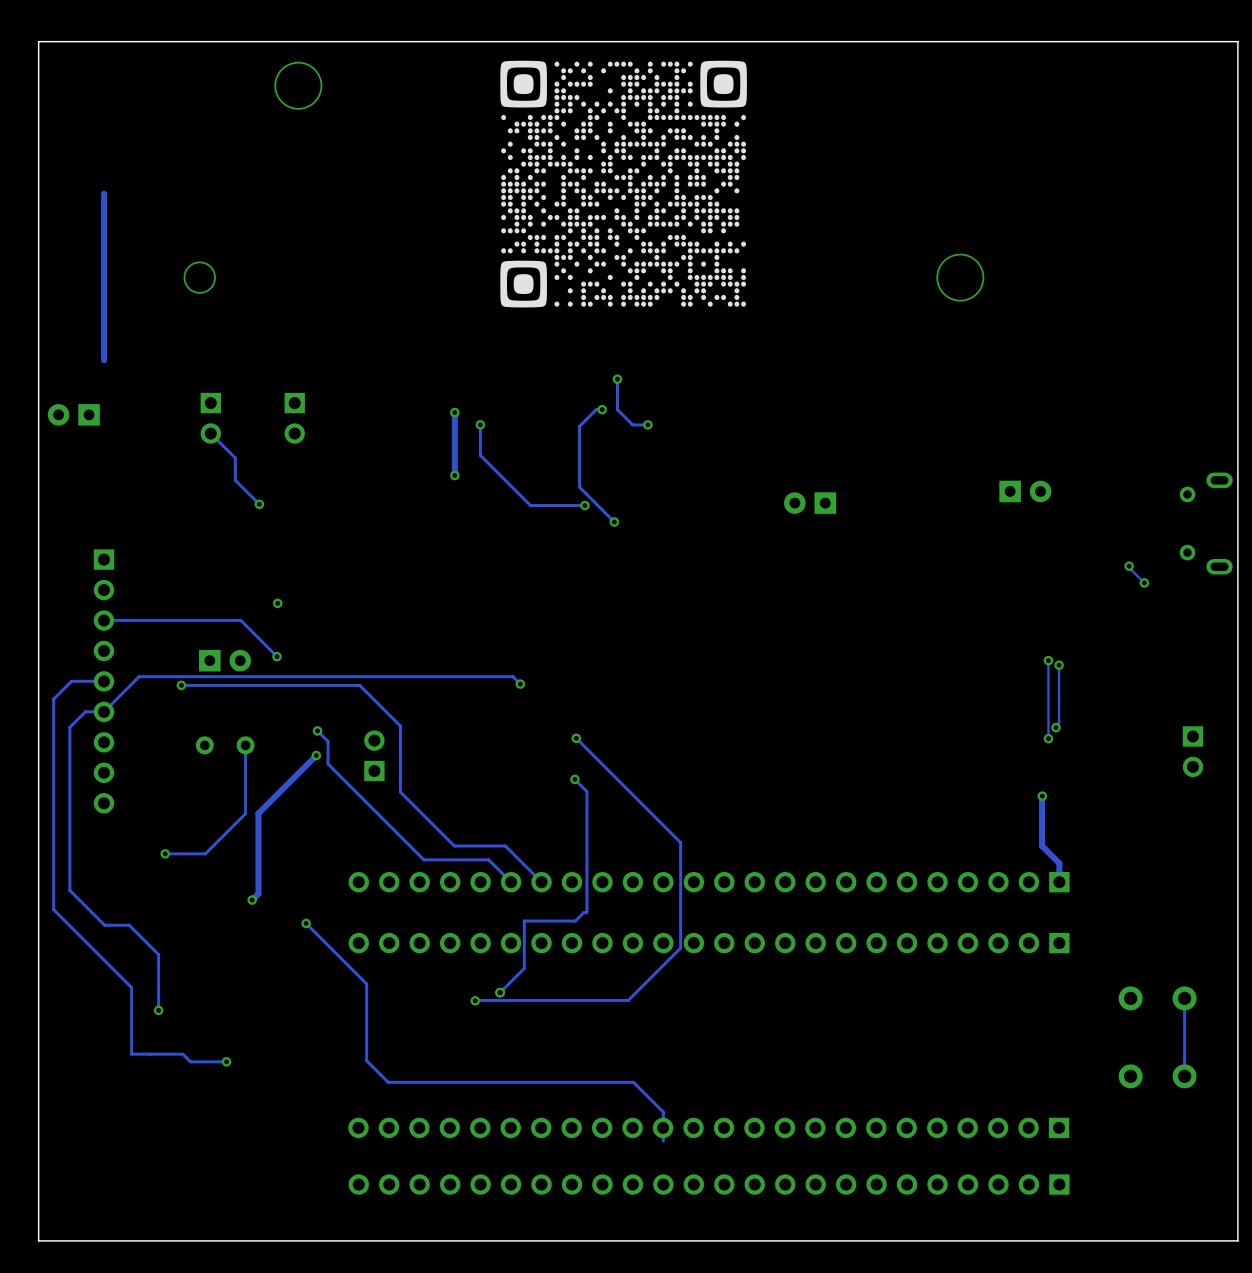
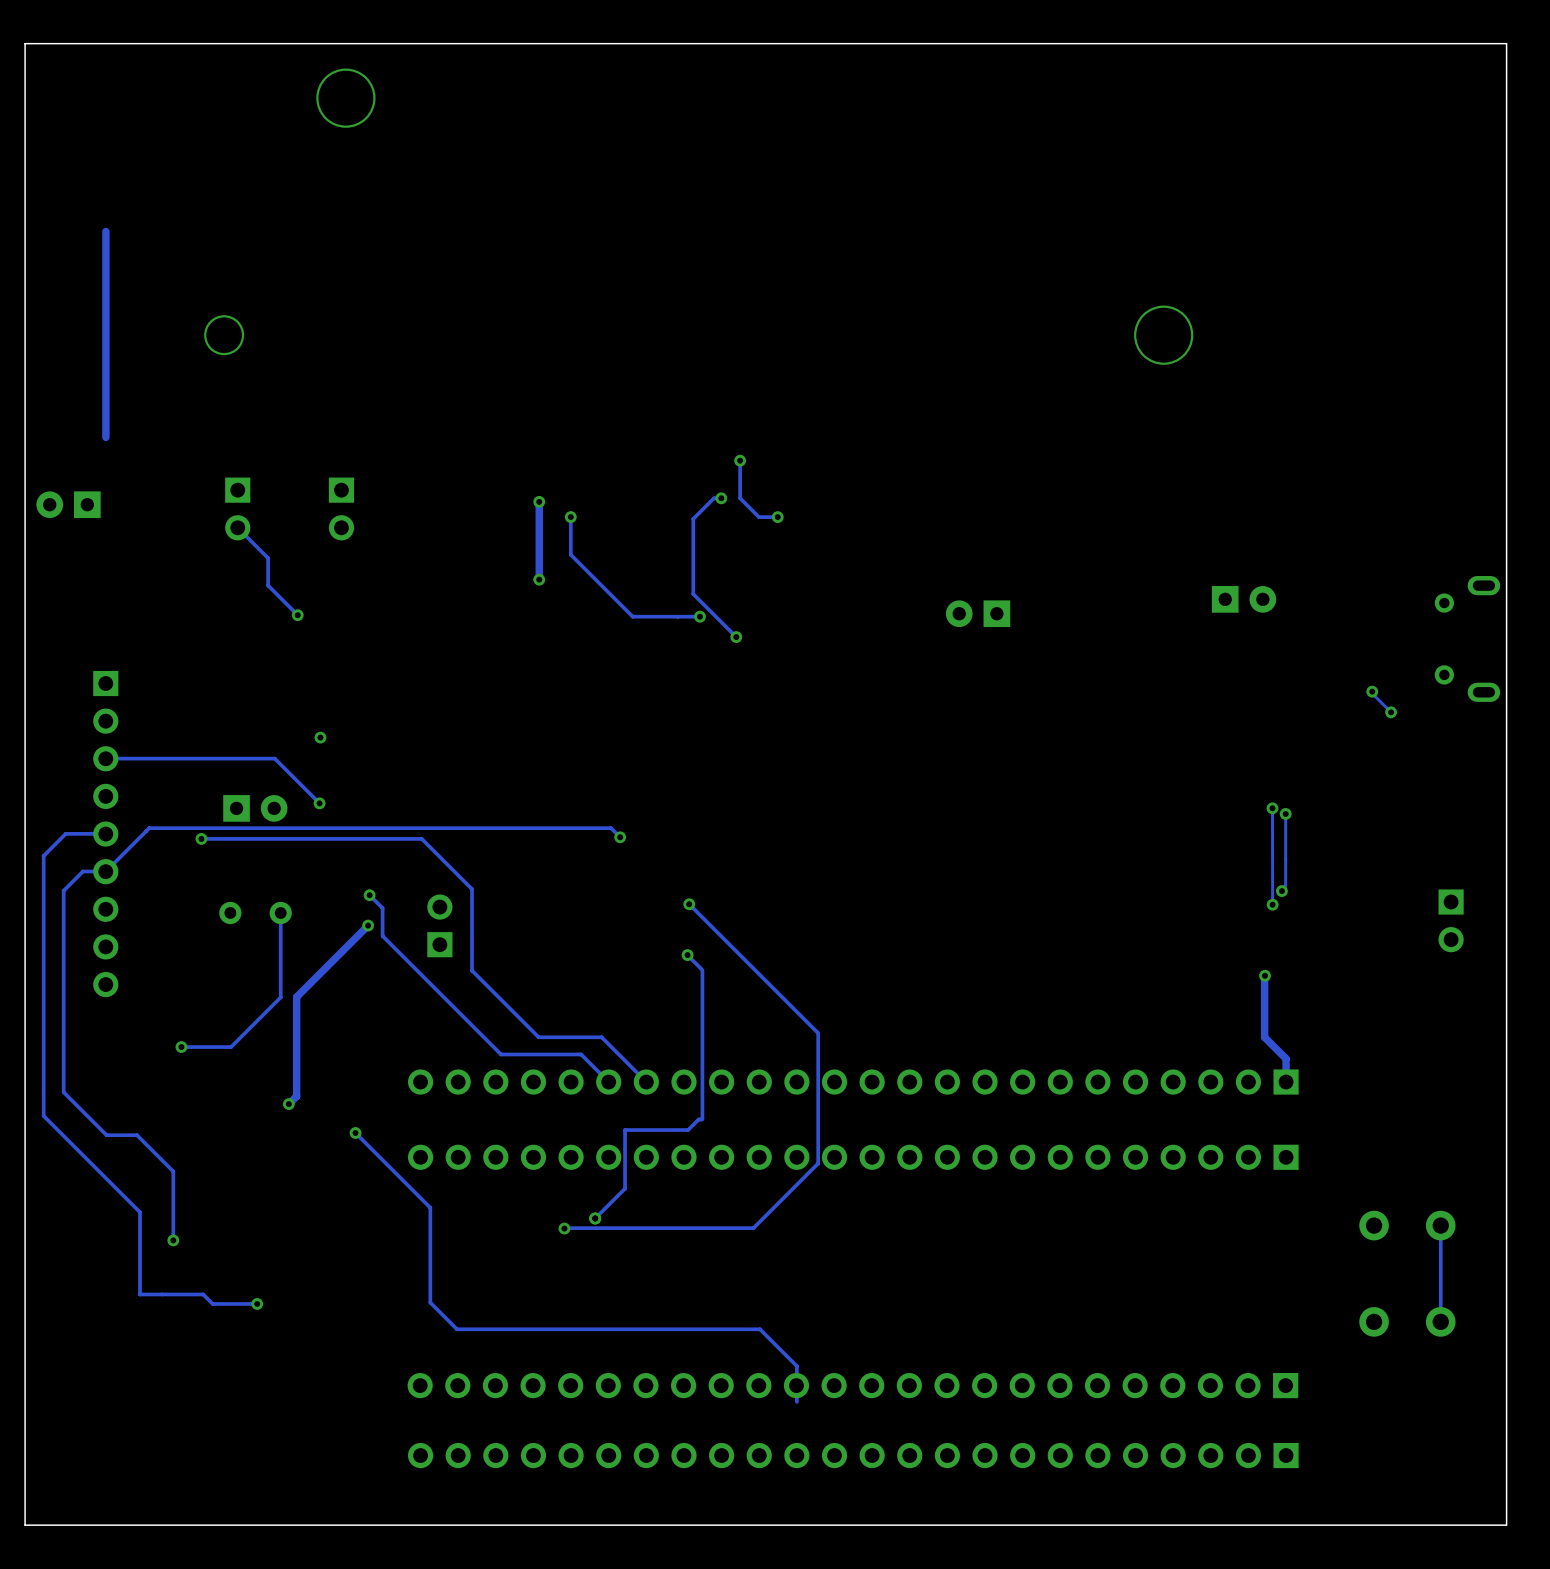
drawing: [500, 60, 747, 308] -> none

